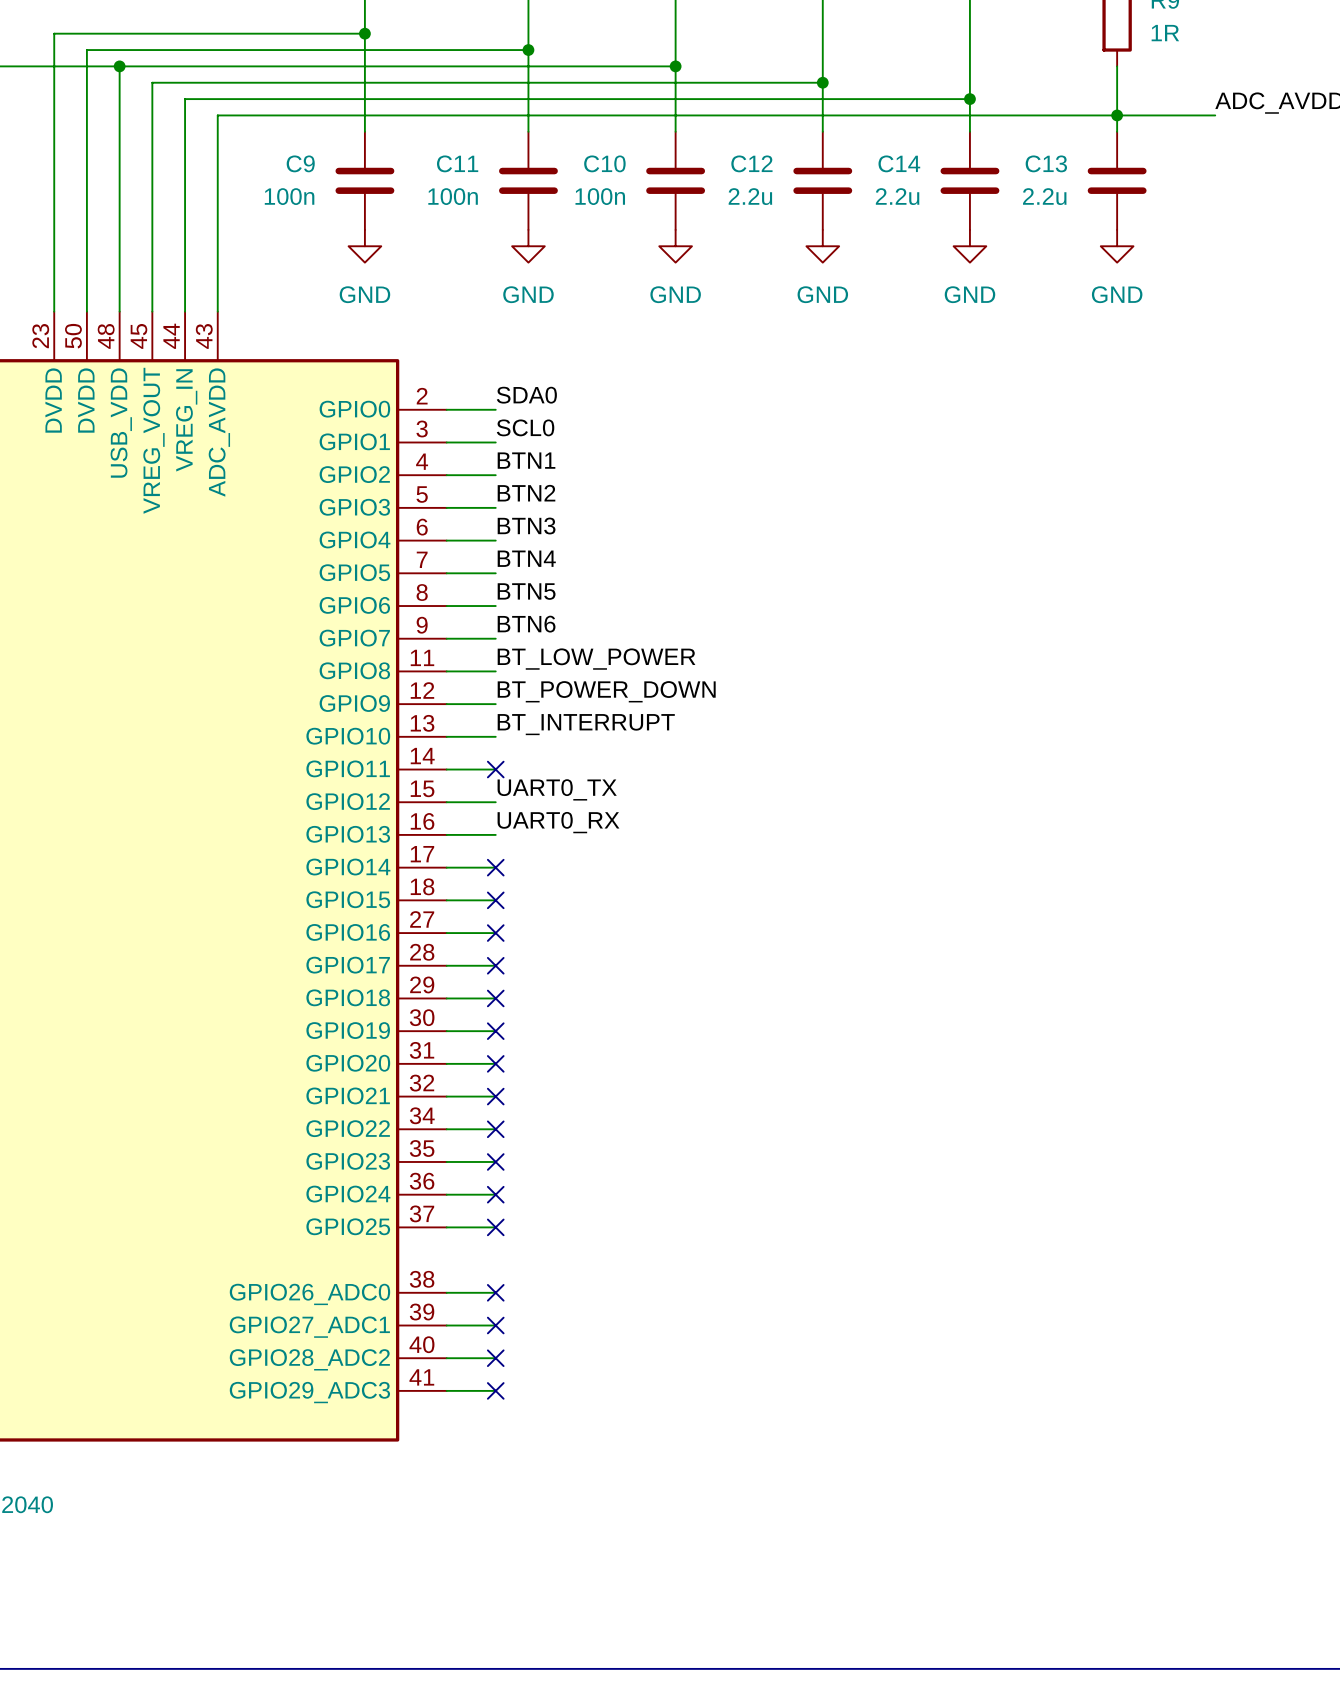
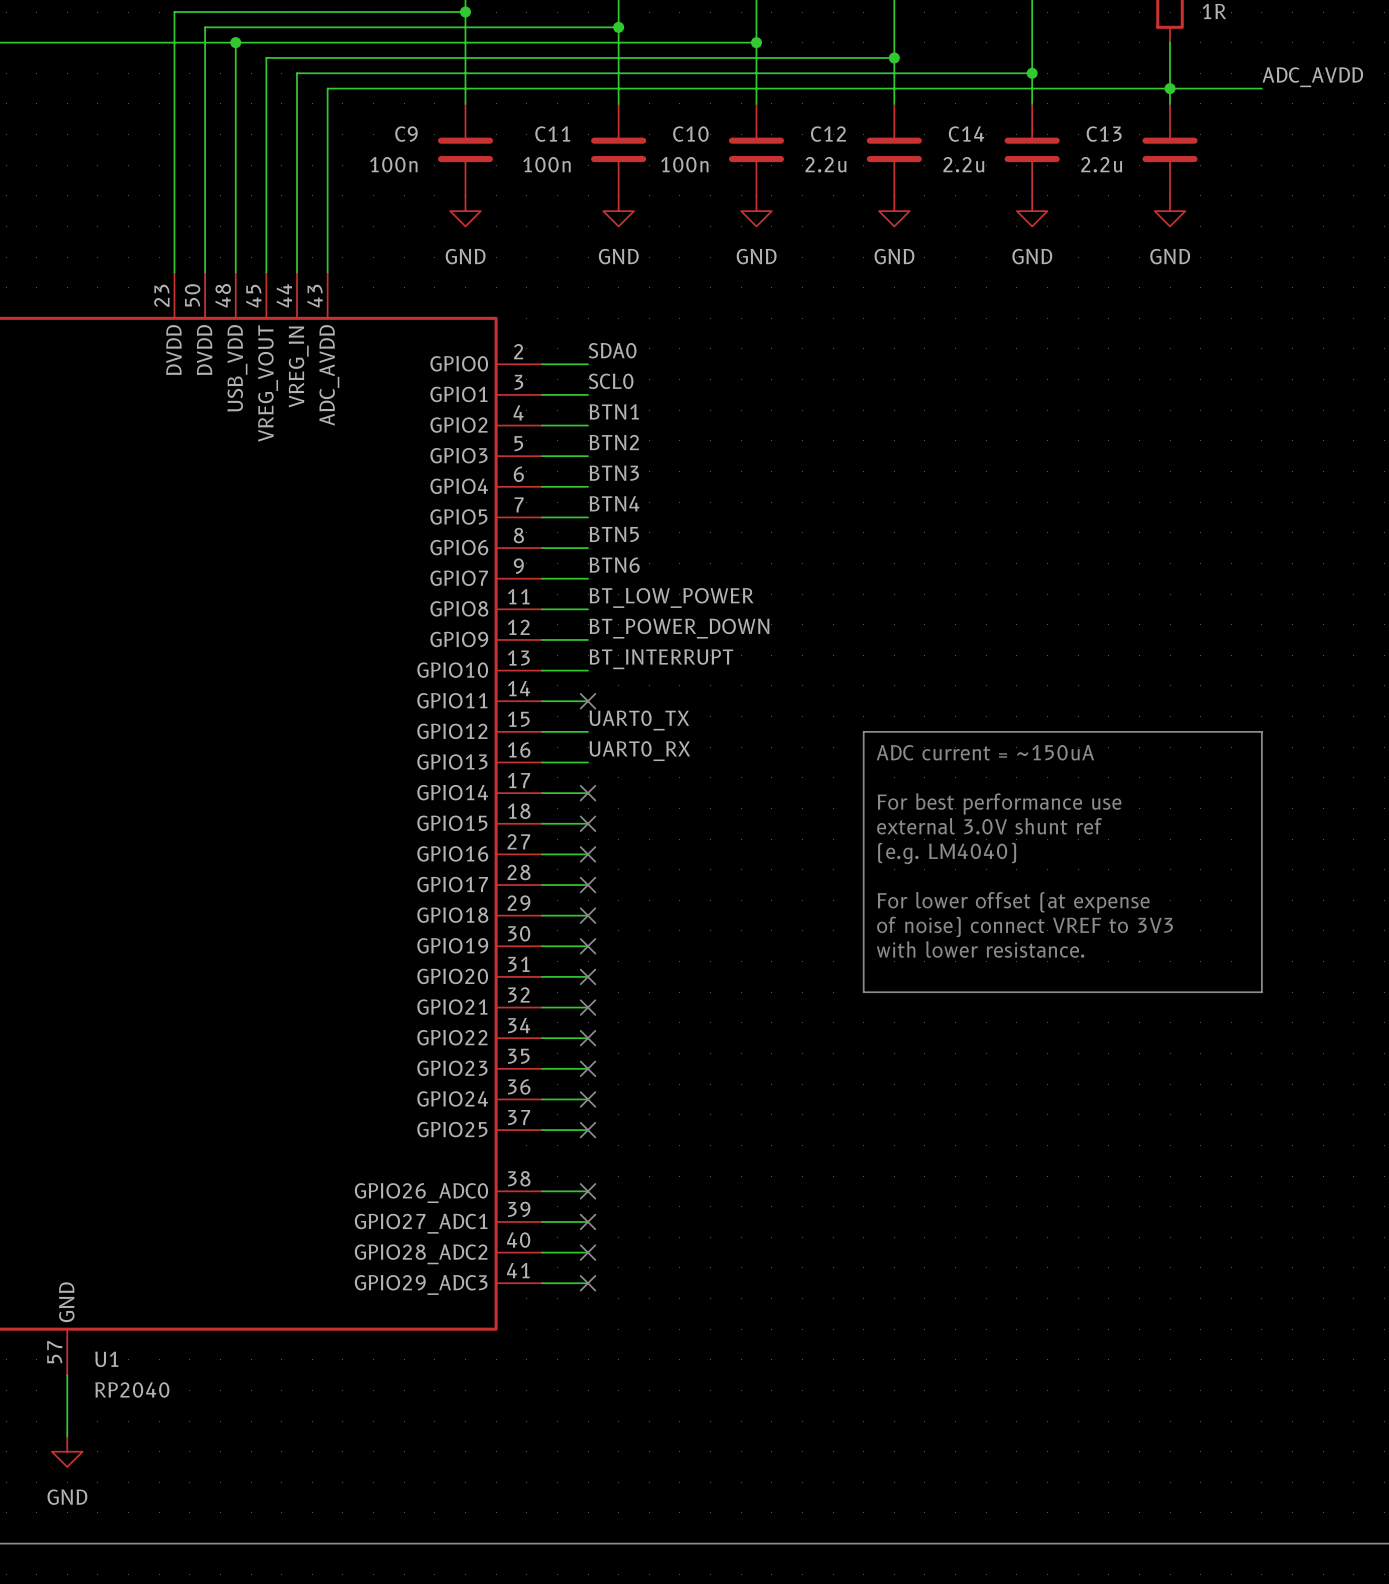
line: none -> (863, 731) (1261, 731) (1261, 992) (863, 992) (863, 731)
text: none -> ADC current = ~150uA (985, 752)
text: none -> For best performance use (999, 803)
text: none -> external 3.0V shunt ref (989, 826)
text: none -> (e.g. LM4040) (947, 853)
text: none -> For lower offset (at expense (1013, 902)
text: none -> of noise) connect VREF to 3V3 (1025, 926)
text: none -> with lower resistance. (980, 949)

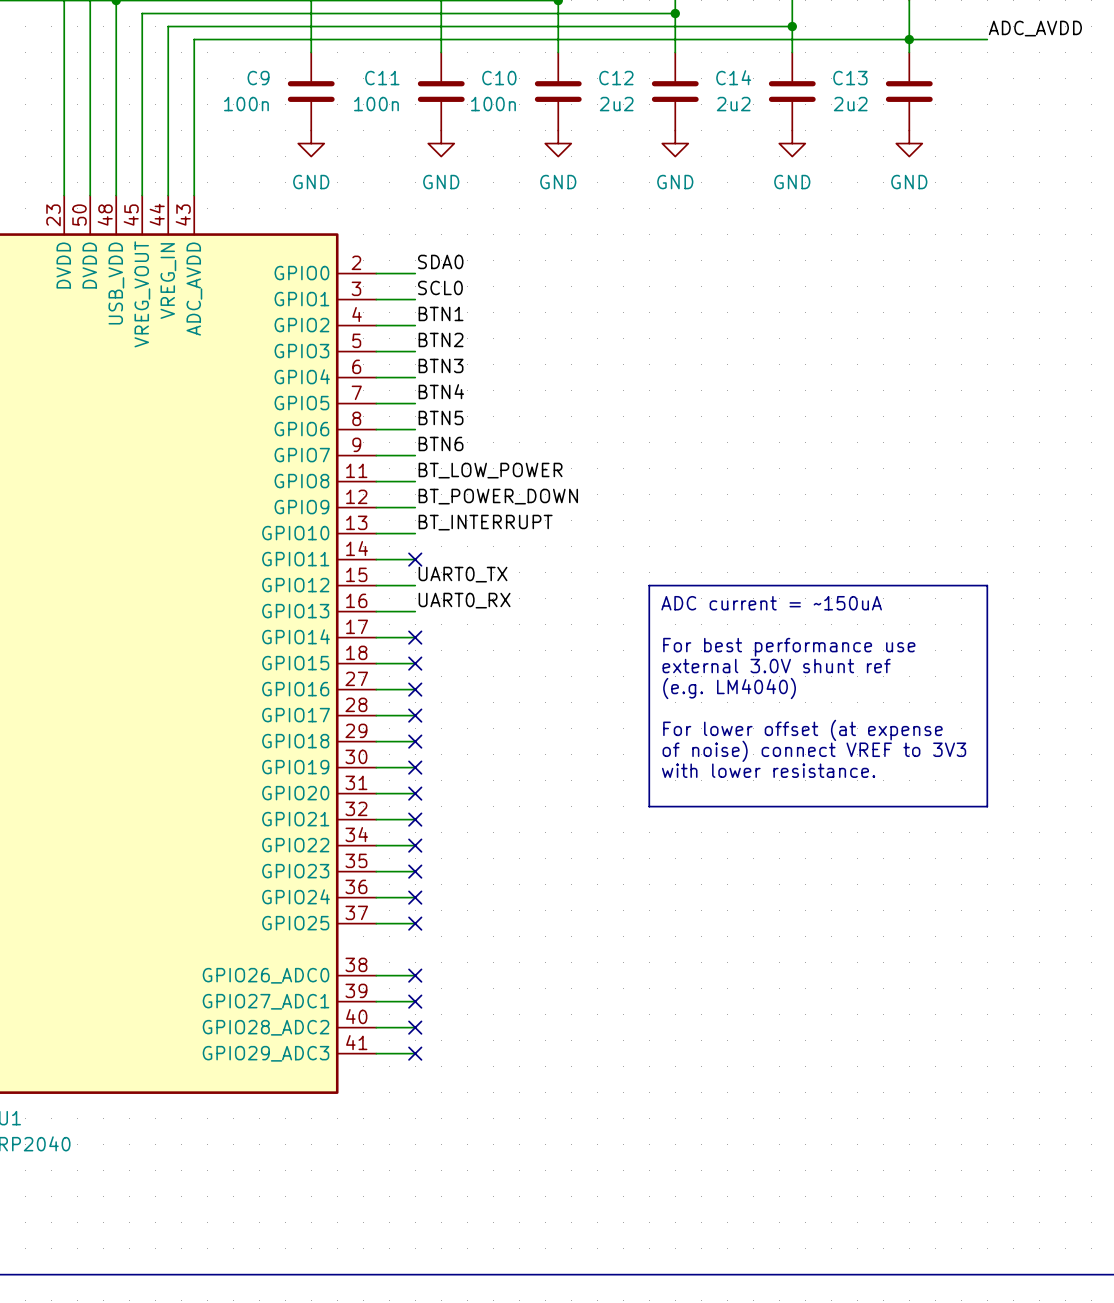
C12 value: 2.2u (825, 164) -> 2u2 (616, 104)
C14 value: 2.2u (963, 164) -> 2u2 (733, 104)
C13 value: 2.2u (1101, 164) -> 2u2 (850, 104)

